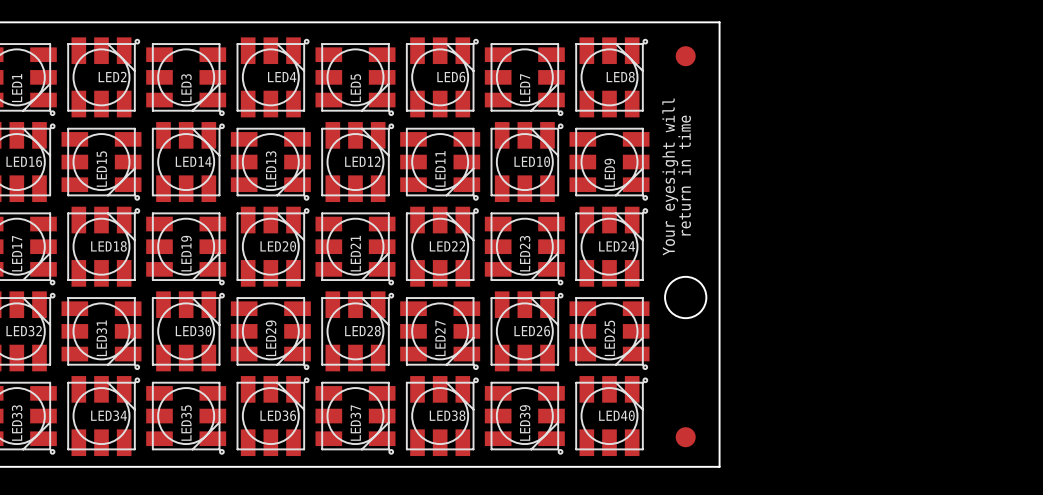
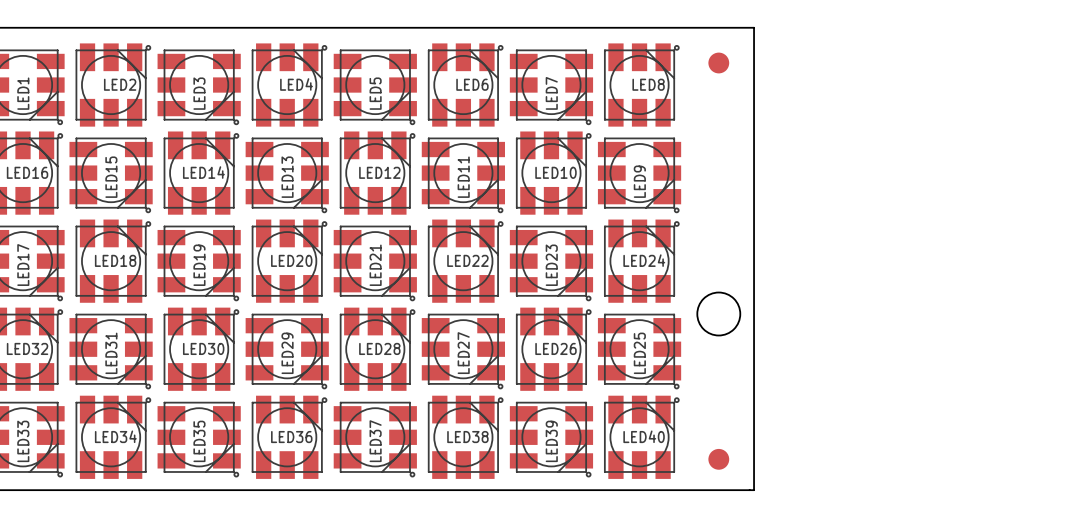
text: return in time (684, 175) -> none
text: Your eyesight will (670, 177) -> none

